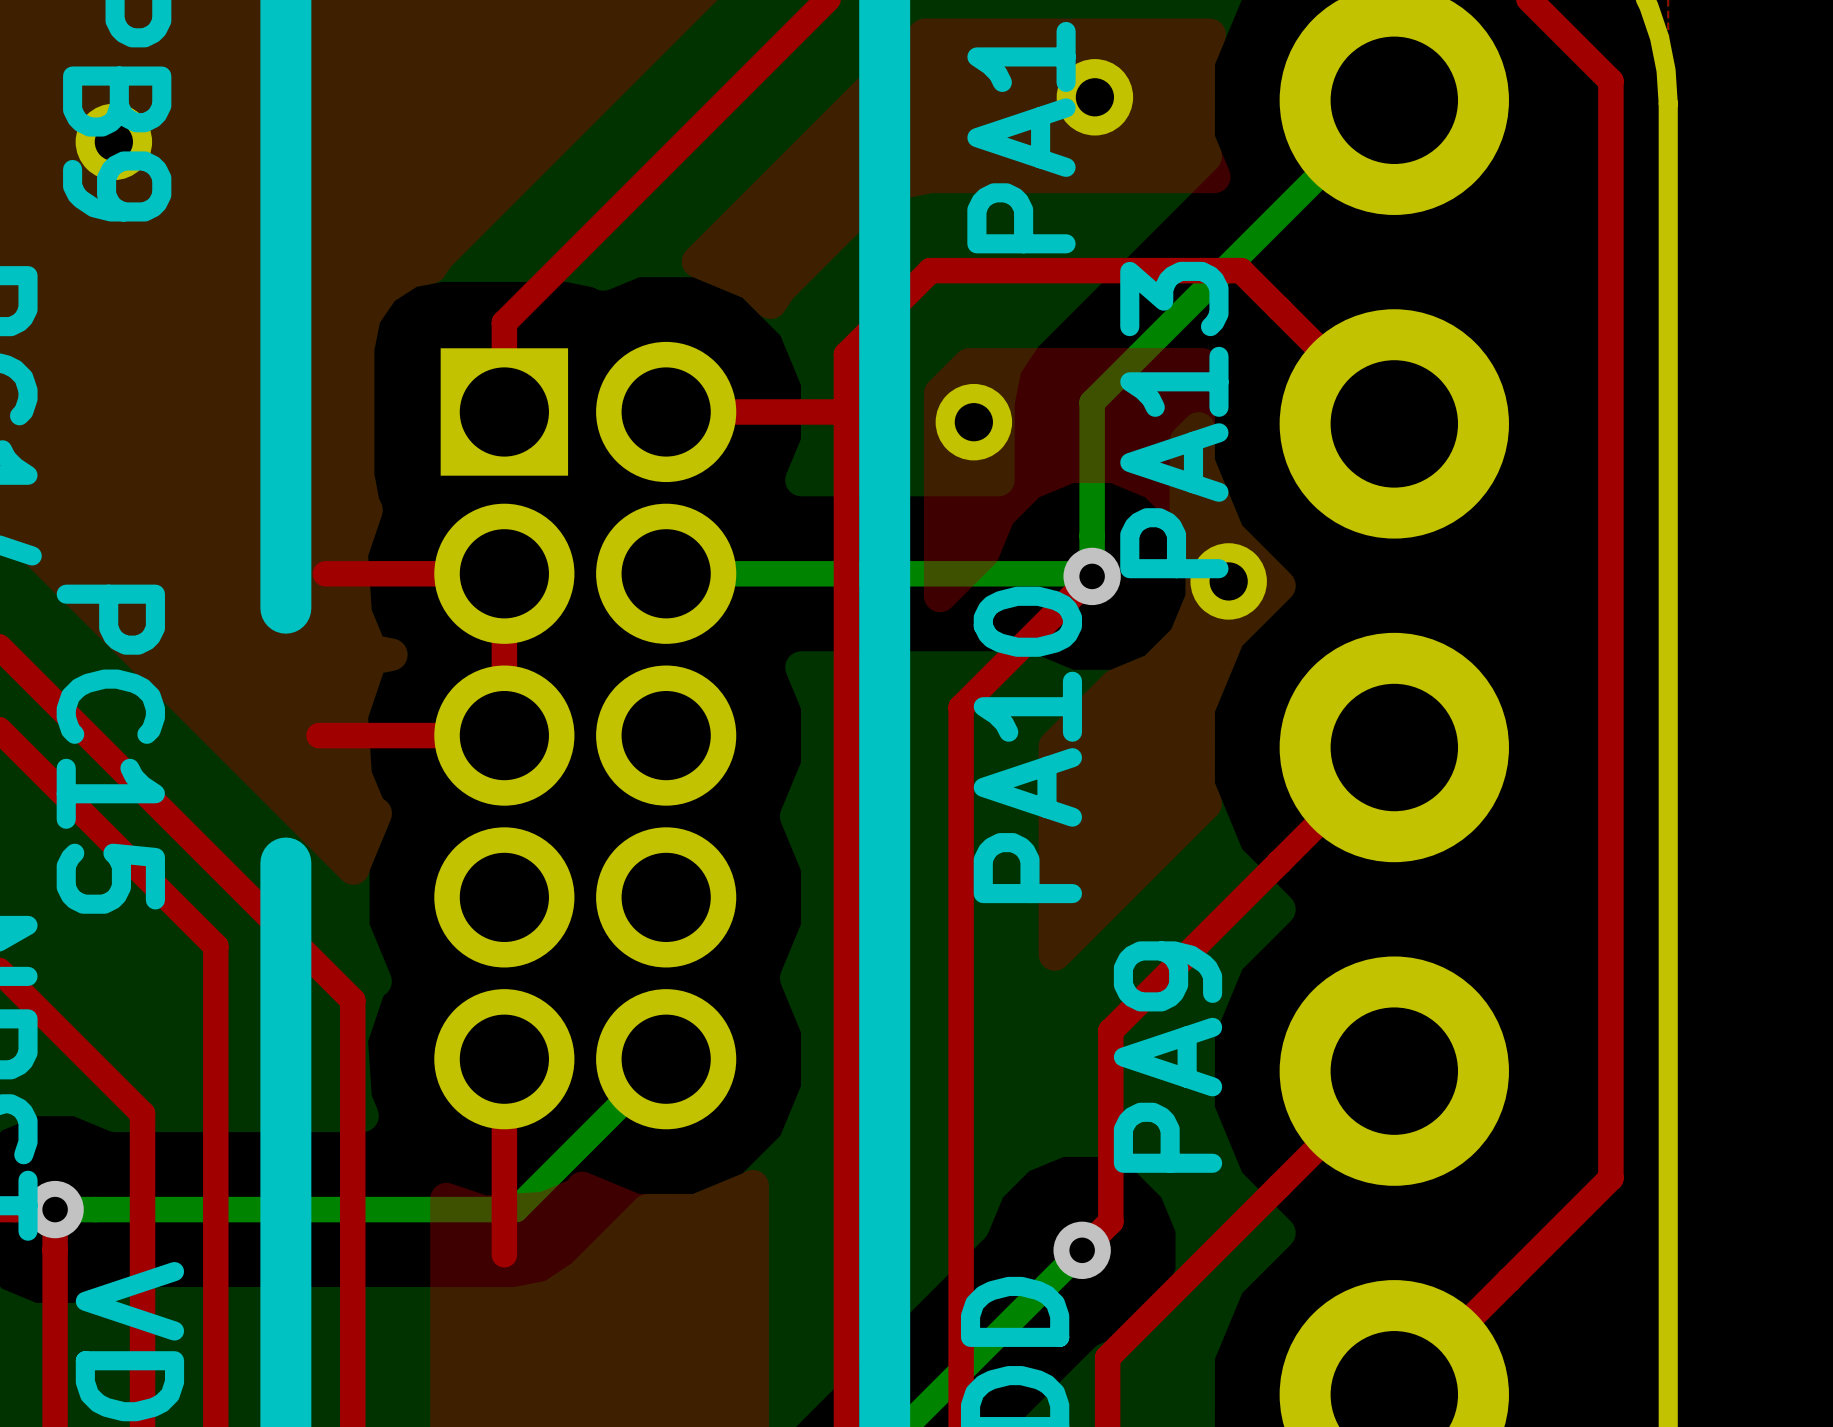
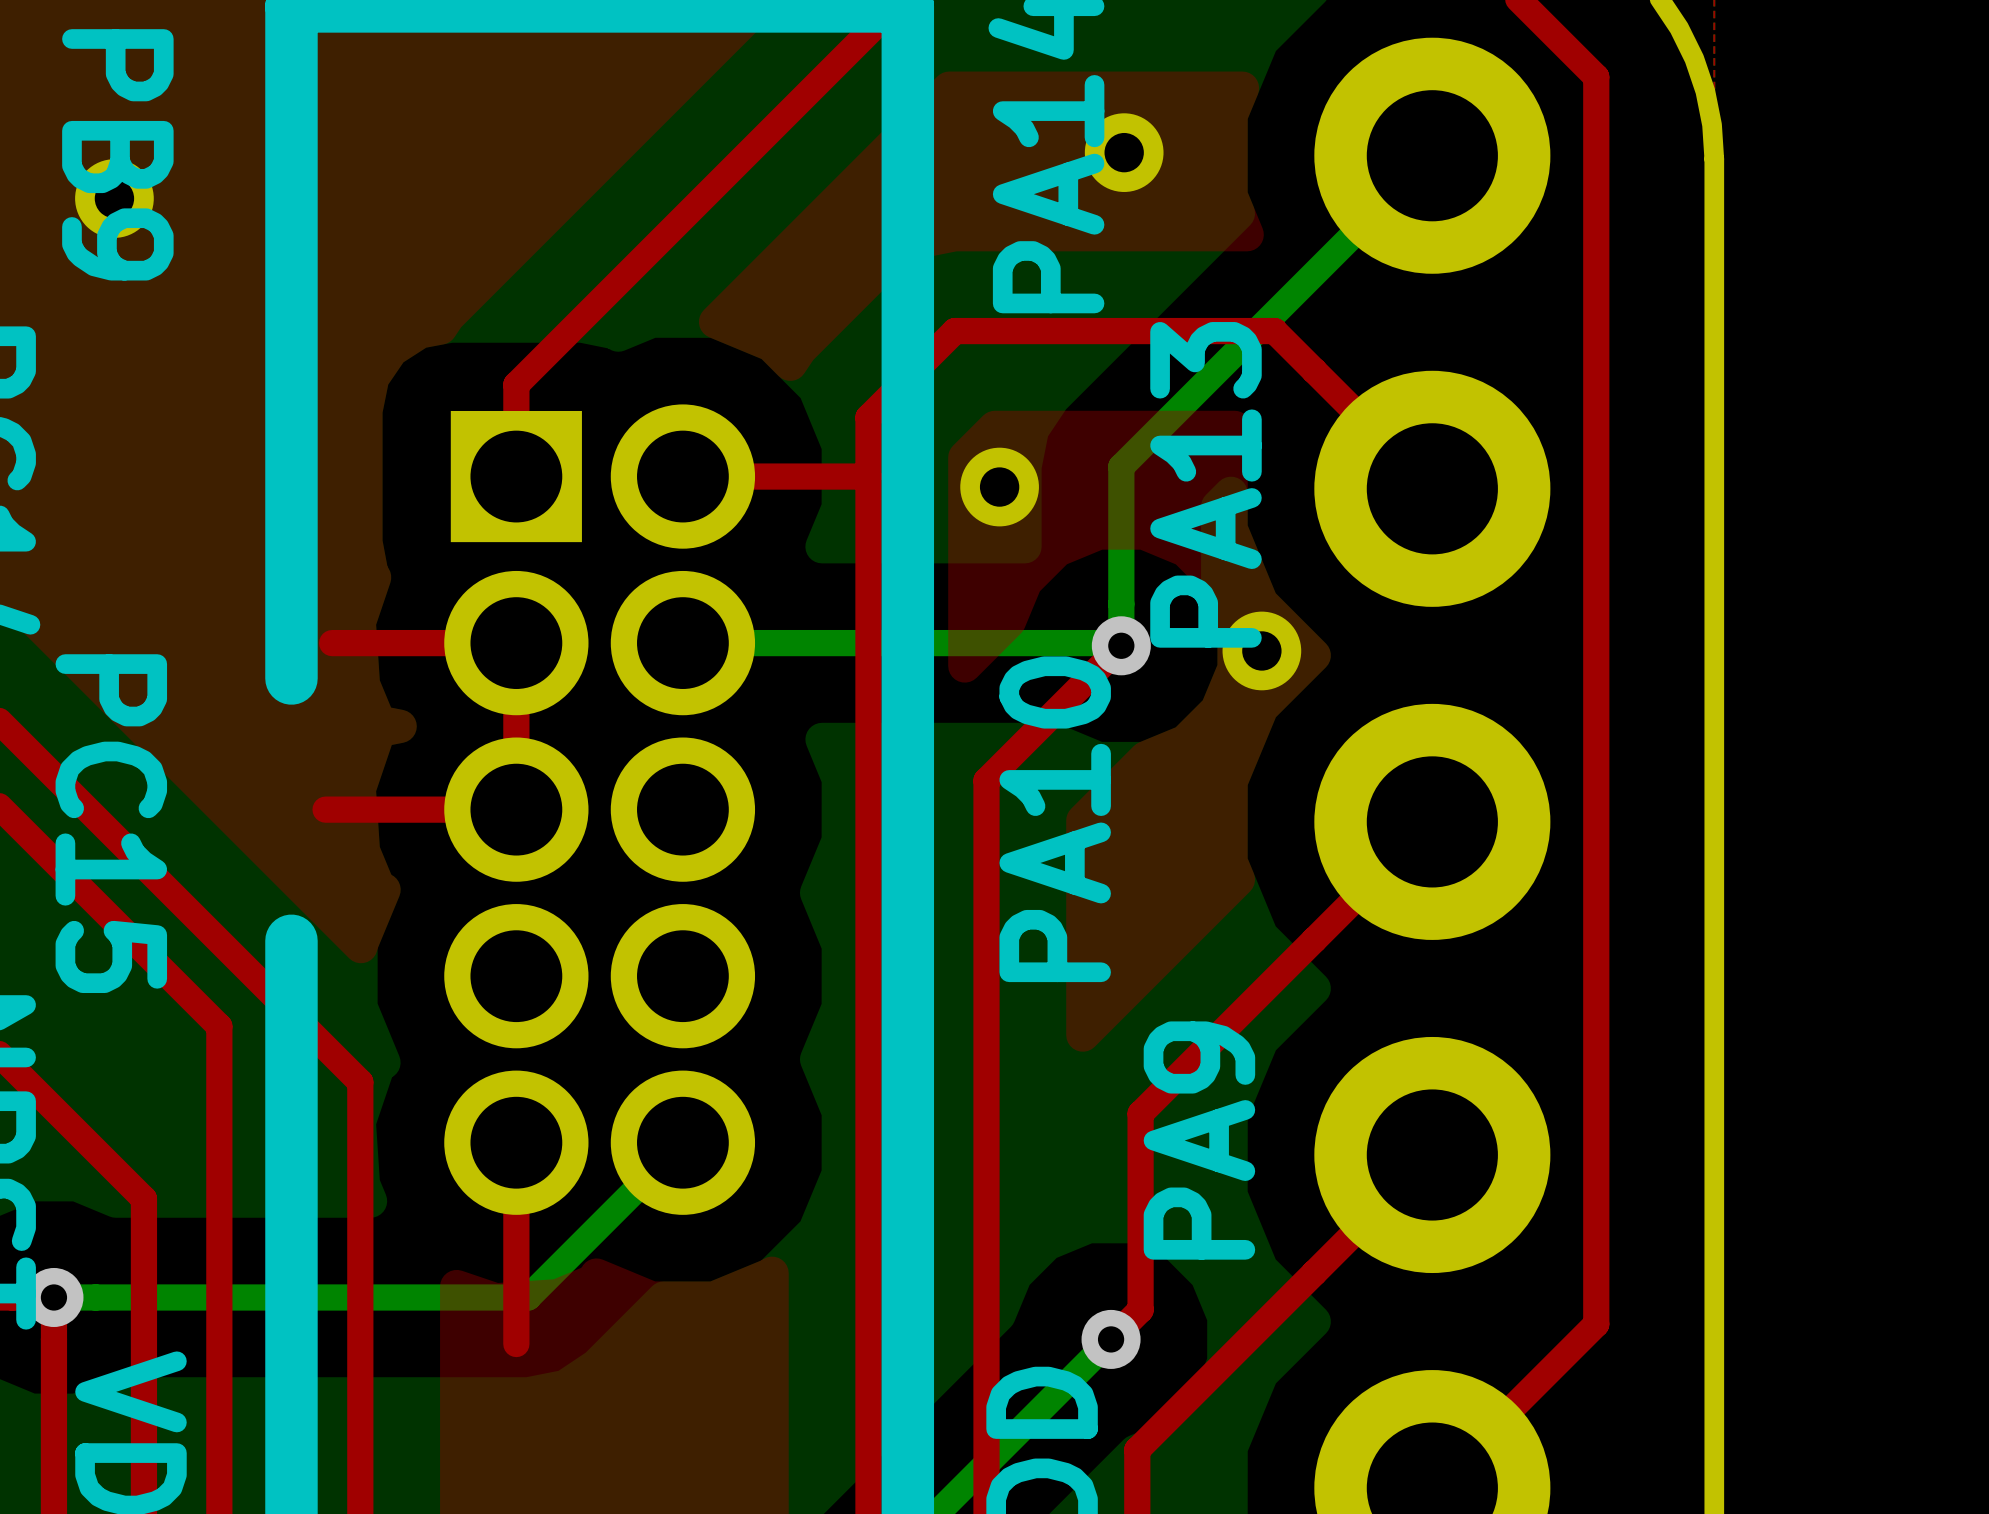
top track: (1553, 23) (1610, 81) (1610, 1178) (1553, 1235) -> (1596, 77) (1596, 1324)

